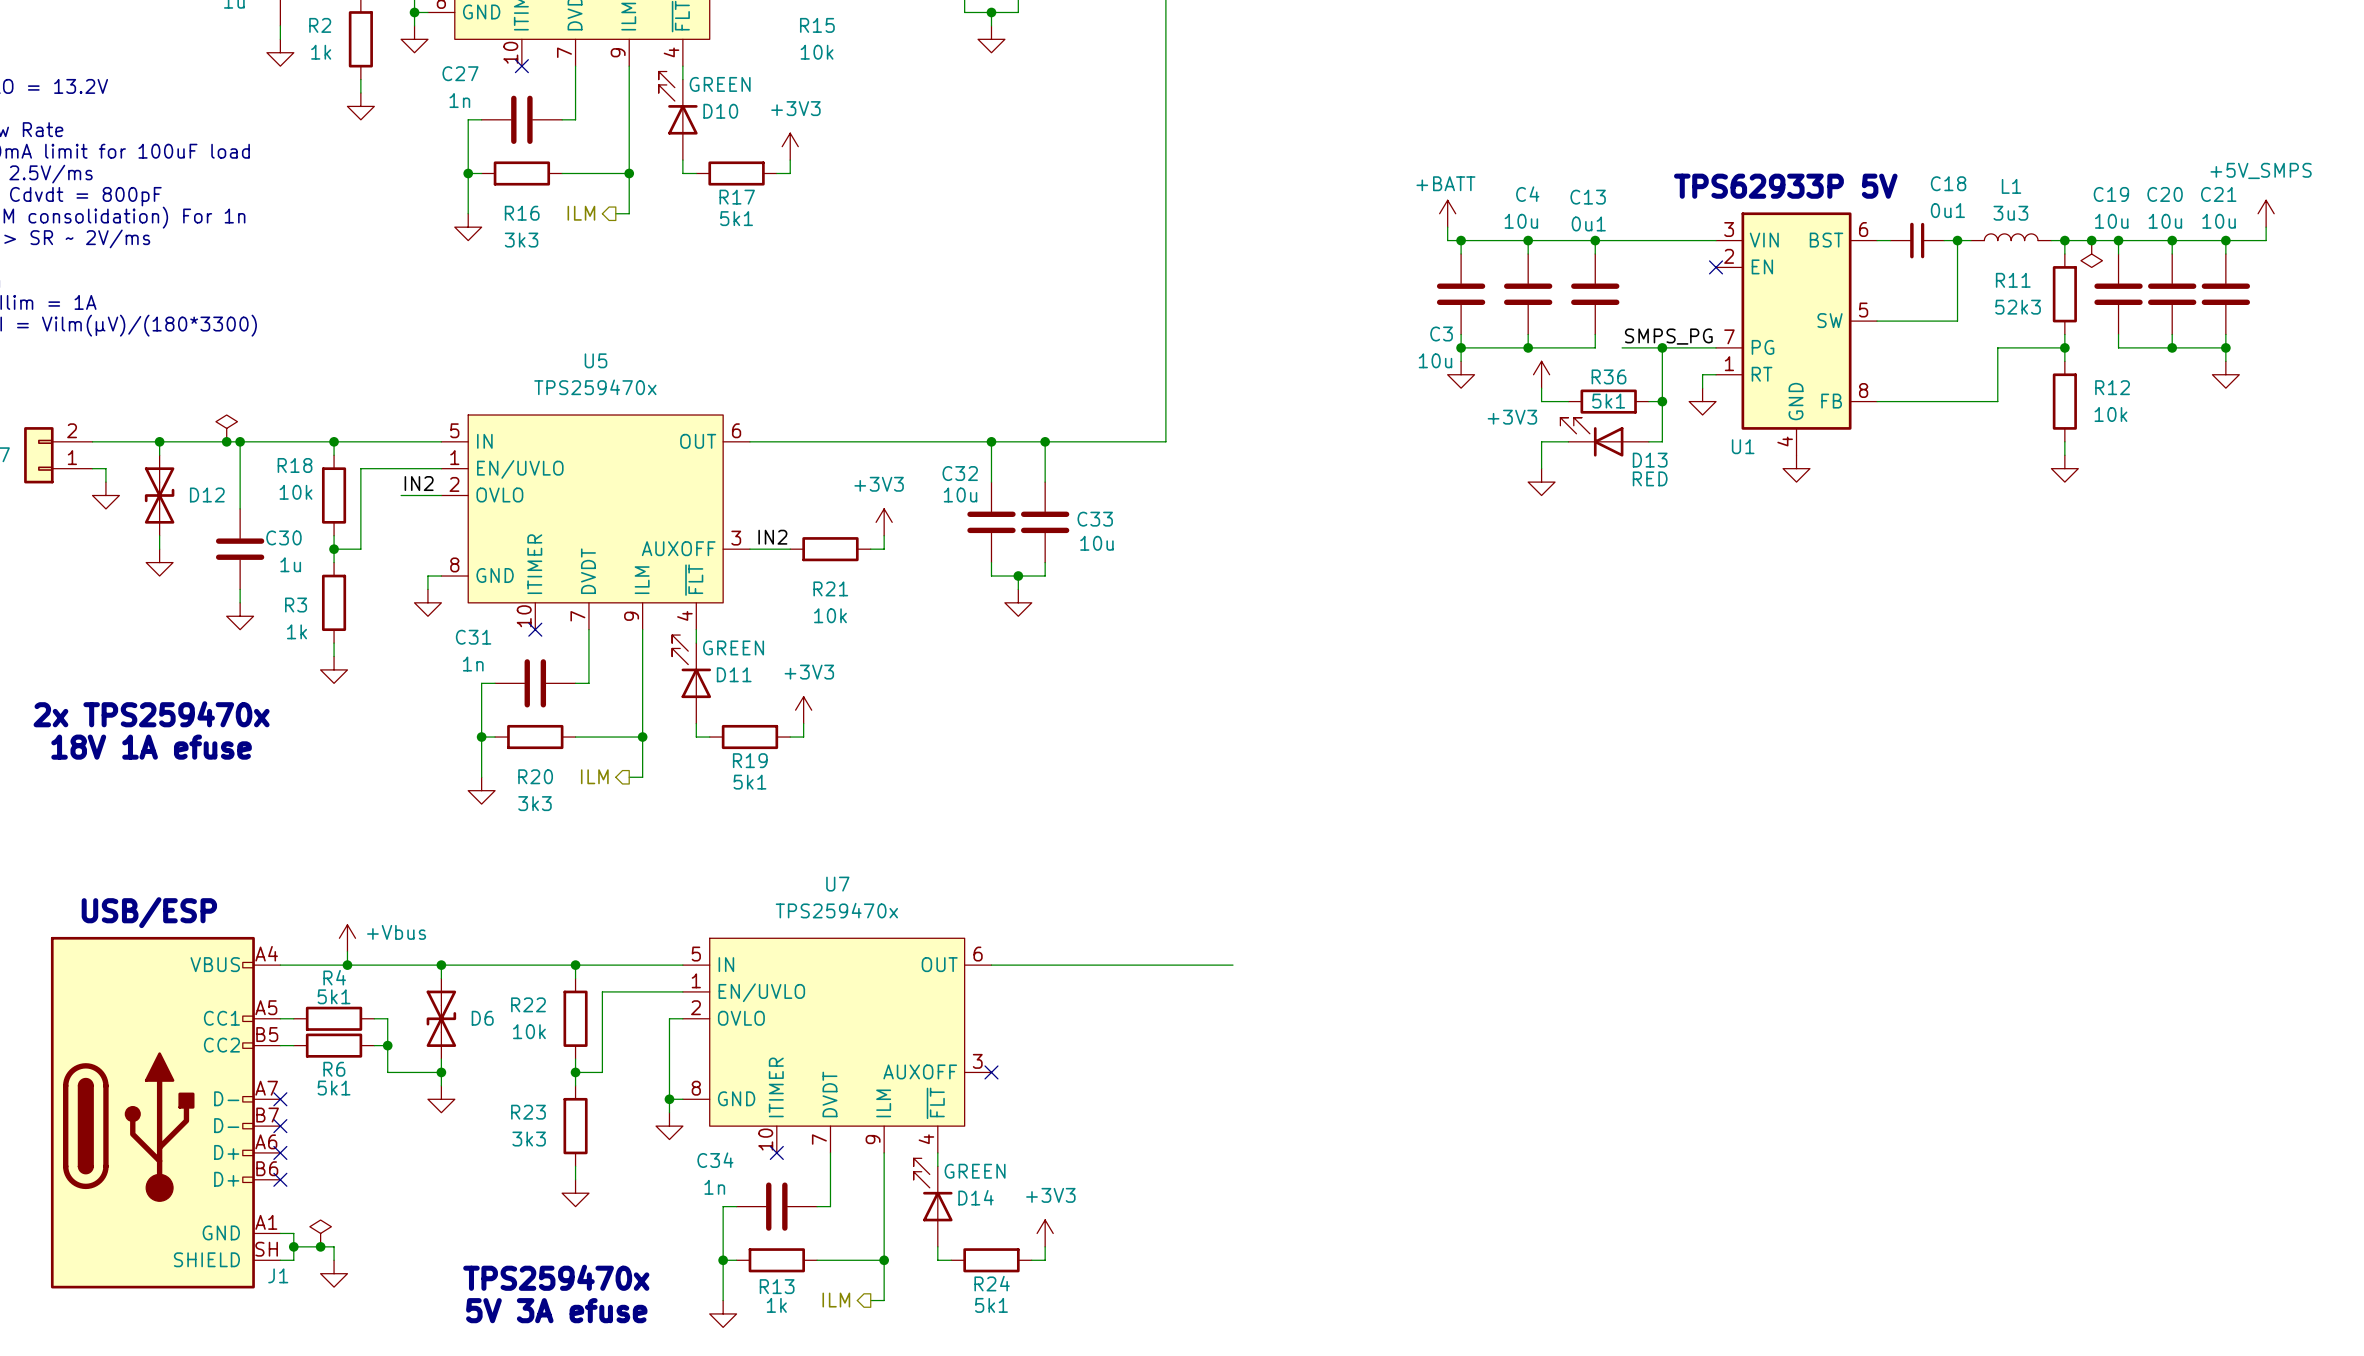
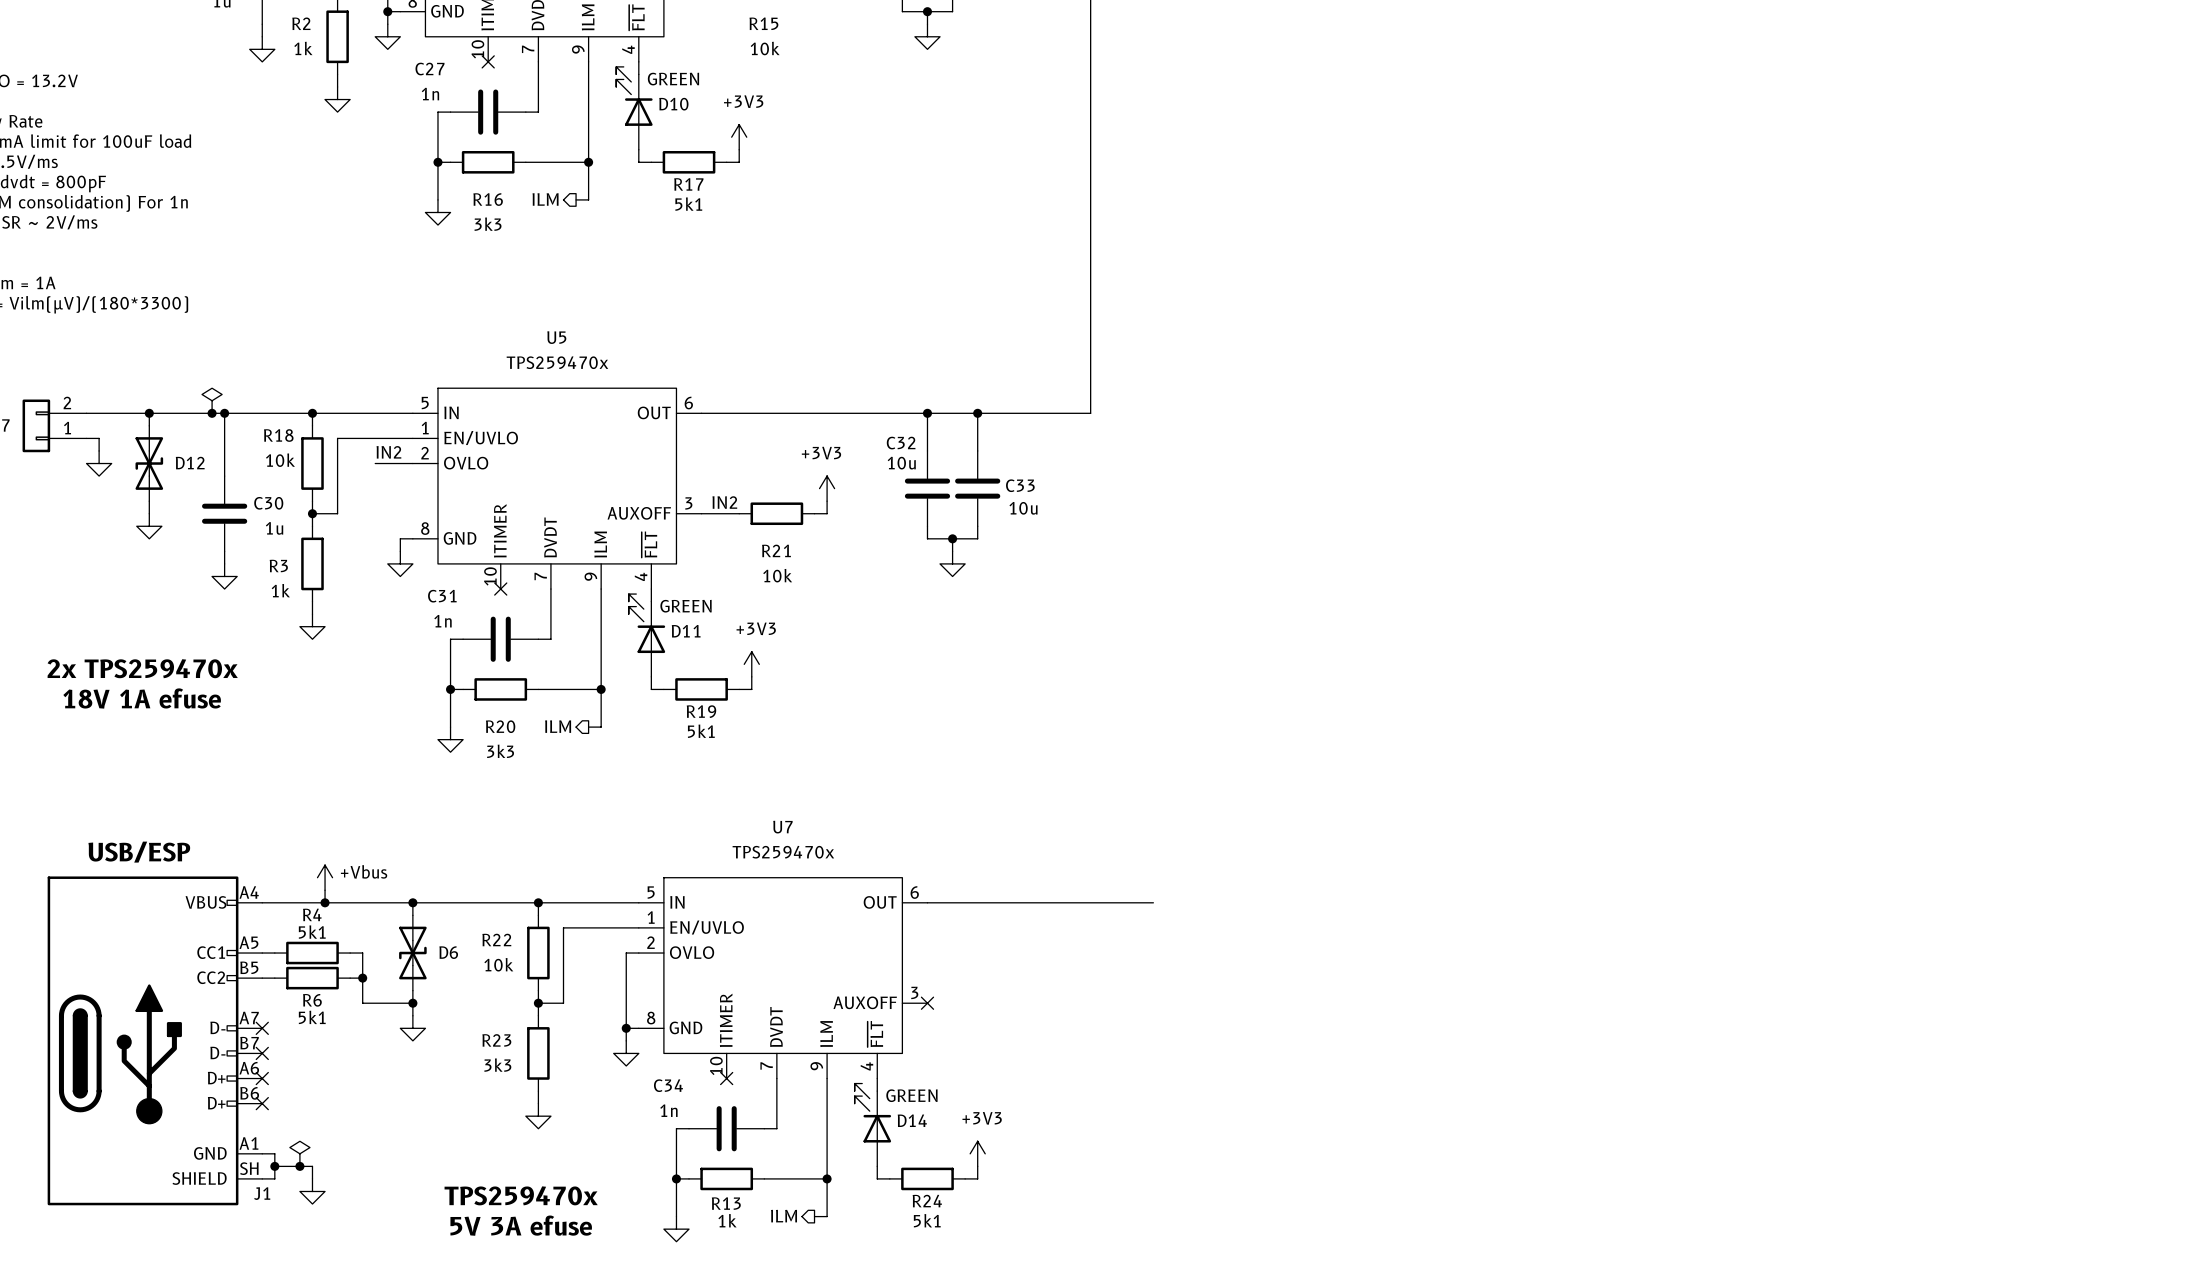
text: TPS62933P 5V (1785, 186) -> none
power symbol: +BATT (1447, 213) -> none
power symbol: +5V_SMPS (2266, 213) -> none
wire: (1447, 227) (1447, 240) (1716, 240) -> none
wire: (2266, 227) (2266, 240) (2051, 240) -> none
L1: 3u3 (2011, 237) -> none
wire: (1461, 240) (1461, 253) -> none
junction: (1461, 240) -> none
wire: (1528, 240) (1528, 253) -> none
junction: (1528, 240) -> none
wire: (1595, 240) (1595, 253) -> none
junction: (1595, 240) -> none
wire: (1877, 240) (1890, 240) -> none
C18: 0u1 (1917, 240) -> none
wire: (1944, 240) (1970, 240) -> none
wire: (1957, 240) (1957, 321) (1877, 321) -> none
junction: (1957, 240) -> none
wire: (2064, 240) (2064, 253) -> none
junction: (2064, 240) -> none
junction: (2091, 240) -> none
wire: (2118, 240) (2118, 253) -> none
junction: (2118, 240) -> none
wire: (2172, 240) (2172, 253) -> none
junction: (2172, 240) -> none
wire: (2225, 240) (2225, 253) -> none
junction: (2225, 240) -> none
power symbol: (2091, 253) -> none
no-connect mark: (1716, 267) -> none
C3: 10u (1461, 294) -> none
C4: 10u (1528, 294) -> none
C13: 0u1 (1595, 294) -> none
R11: 52k3 (2064, 294) -> none
C19: 10u (2118, 294) -> none
C20: 10u (2172, 294) -> none
C21: 10u (2225, 294) -> none
U1: (1796, 333) -> none
wire: (1461, 334) (1461, 361) -> none
wire: (1528, 334) (1528, 347) -> none
wire: (1595, 334) (1595, 347) (1461, 347) -> none
wire: (2064, 334) (2064, 361) -> none
wire: (2118, 334) (2118, 347) (2225, 347) -> none
wire: (2172, 334) (2172, 347) -> none
wire: (2225, 334) (2225, 361) -> none
label: SMPS_PG (1668, 336) -> none
junction: (1461, 347) -> none
junction: (1528, 347) -> none
wire: (1622, 347) (1716, 347) -> none
wire: (1662, 347) (1662, 441) (1648, 441) -> none
junction: (1662, 347) -> none
wire: (2064, 347) (1997, 347) (1997, 401) (1877, 401) -> none
junction: (2064, 347) -> none
junction: (2172, 347) -> none
junction: (2225, 347) -> none
power symbol: (1461, 374) -> none
power symbol: +3V3 (1541, 374) -> none
wire: (1716, 374) (1702, 374) (1702, 388) -> none
power symbol: (2225, 374) -> none
wire: (1541, 388) (1541, 401) (1568, 401) -> none
R36: 5k1 (1608, 401) -> none
wire: (1648, 401) (1662, 401) -> none
junction: (1662, 401) -> none
power symbol: (1702, 401) -> none
R12: 10k (2064, 401) -> none
D13: RED (1604, 437) -> none
wire: (1568, 441) (1541, 441) (1541, 468) -> none
wire: (2064, 441) (2064, 455) -> none
power symbol: (1796, 468) -> none
power symbol: (2064, 468) -> none
power symbol: (1541, 482) -> none

